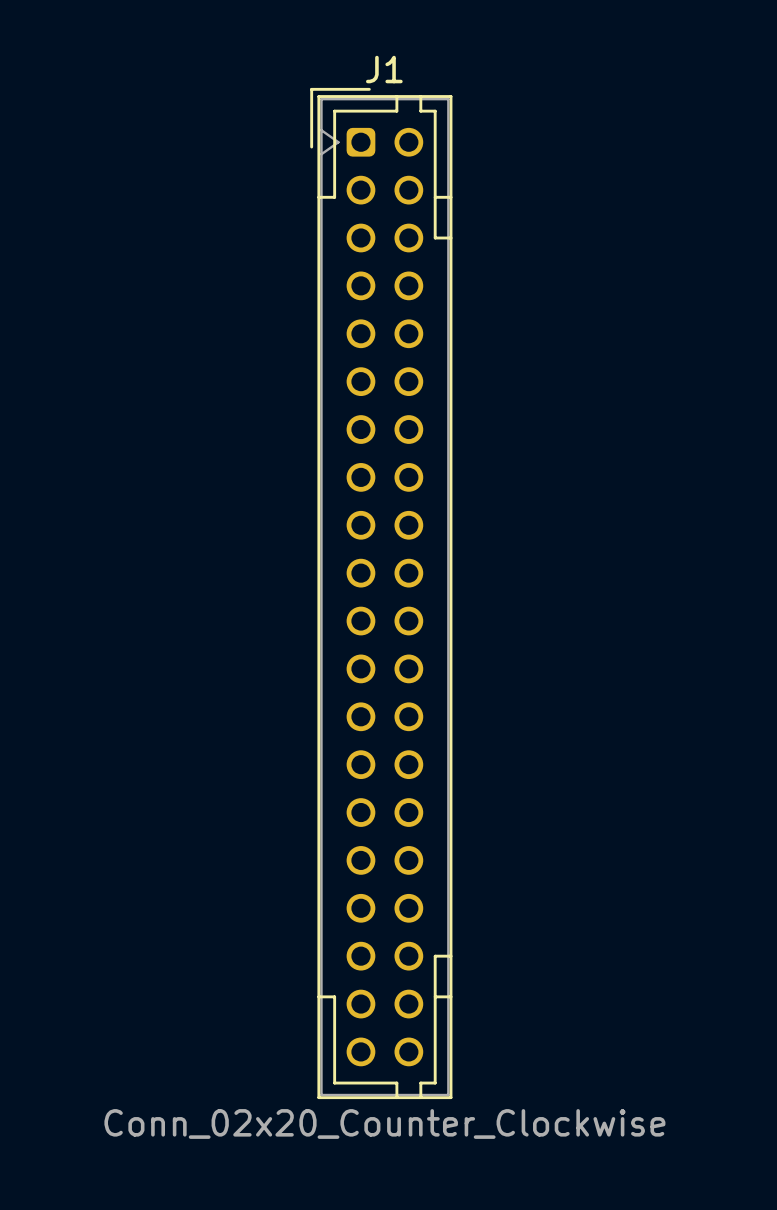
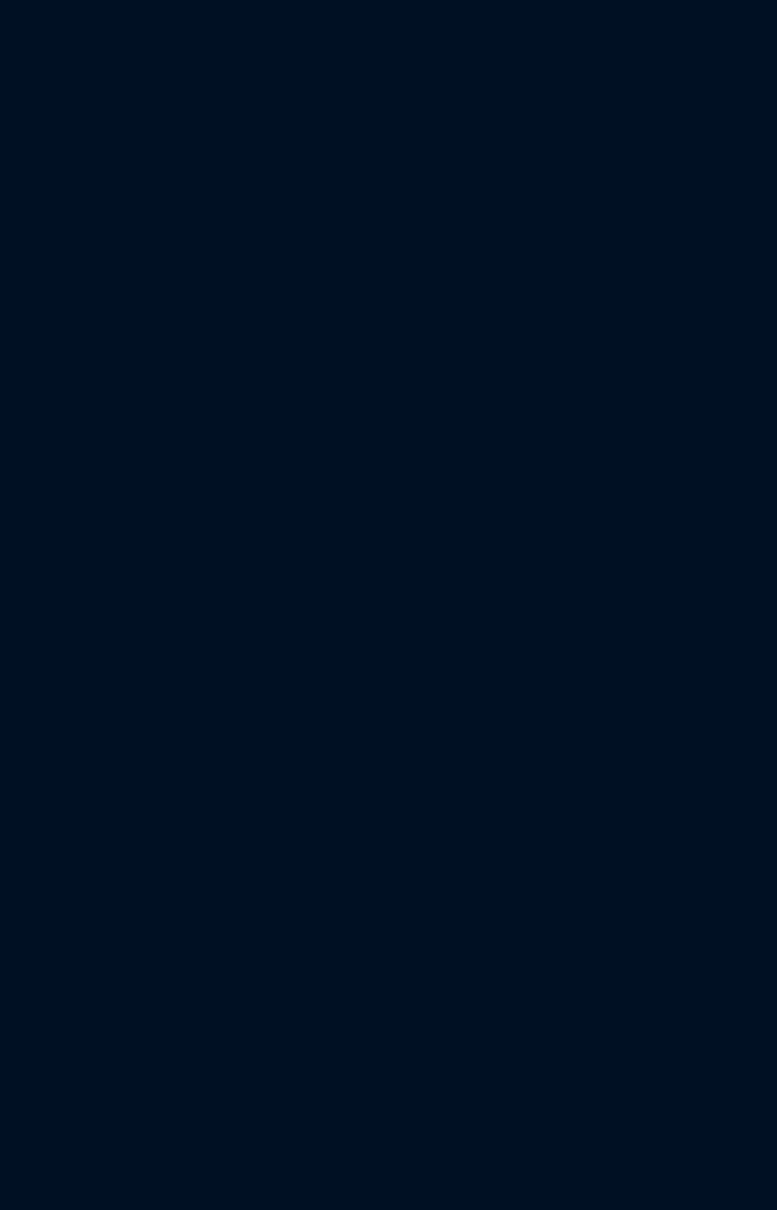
J1: Conn_02x20_Counter_Clockwise (381, 593) -> none

